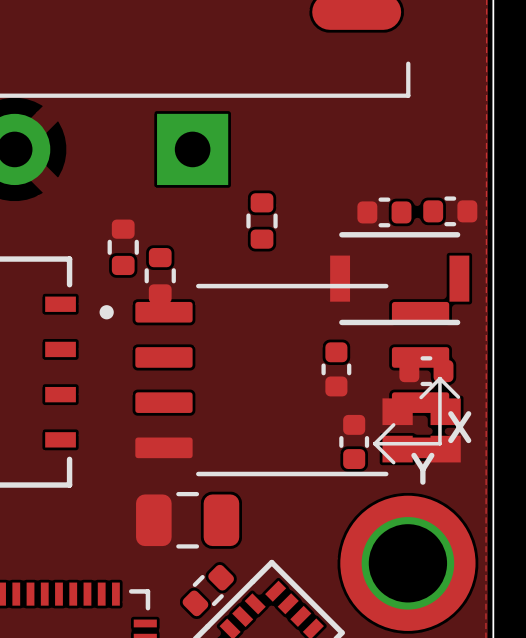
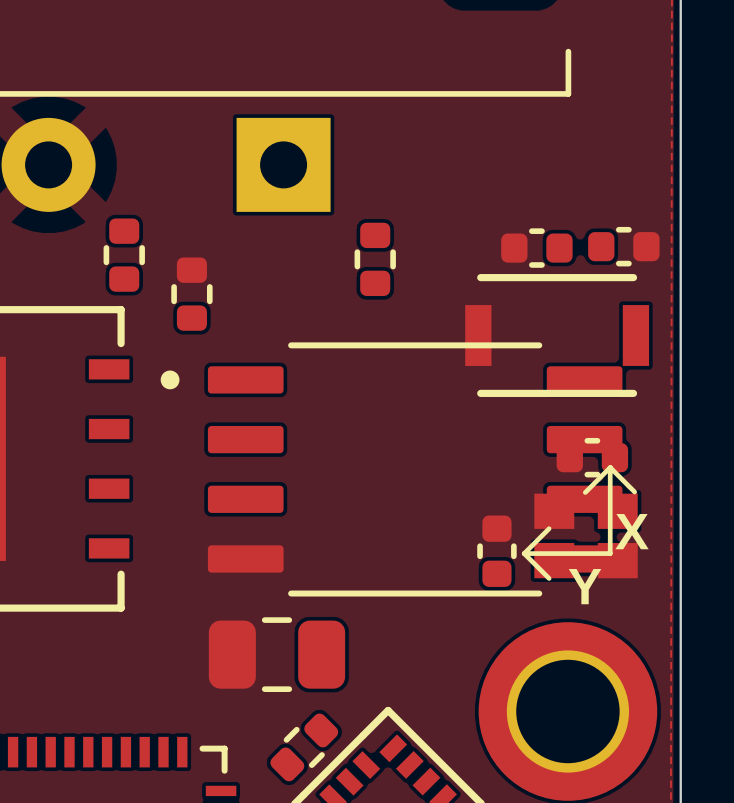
part position: (160, 275) -> (124, 255)
part: (336, 369) -> none

